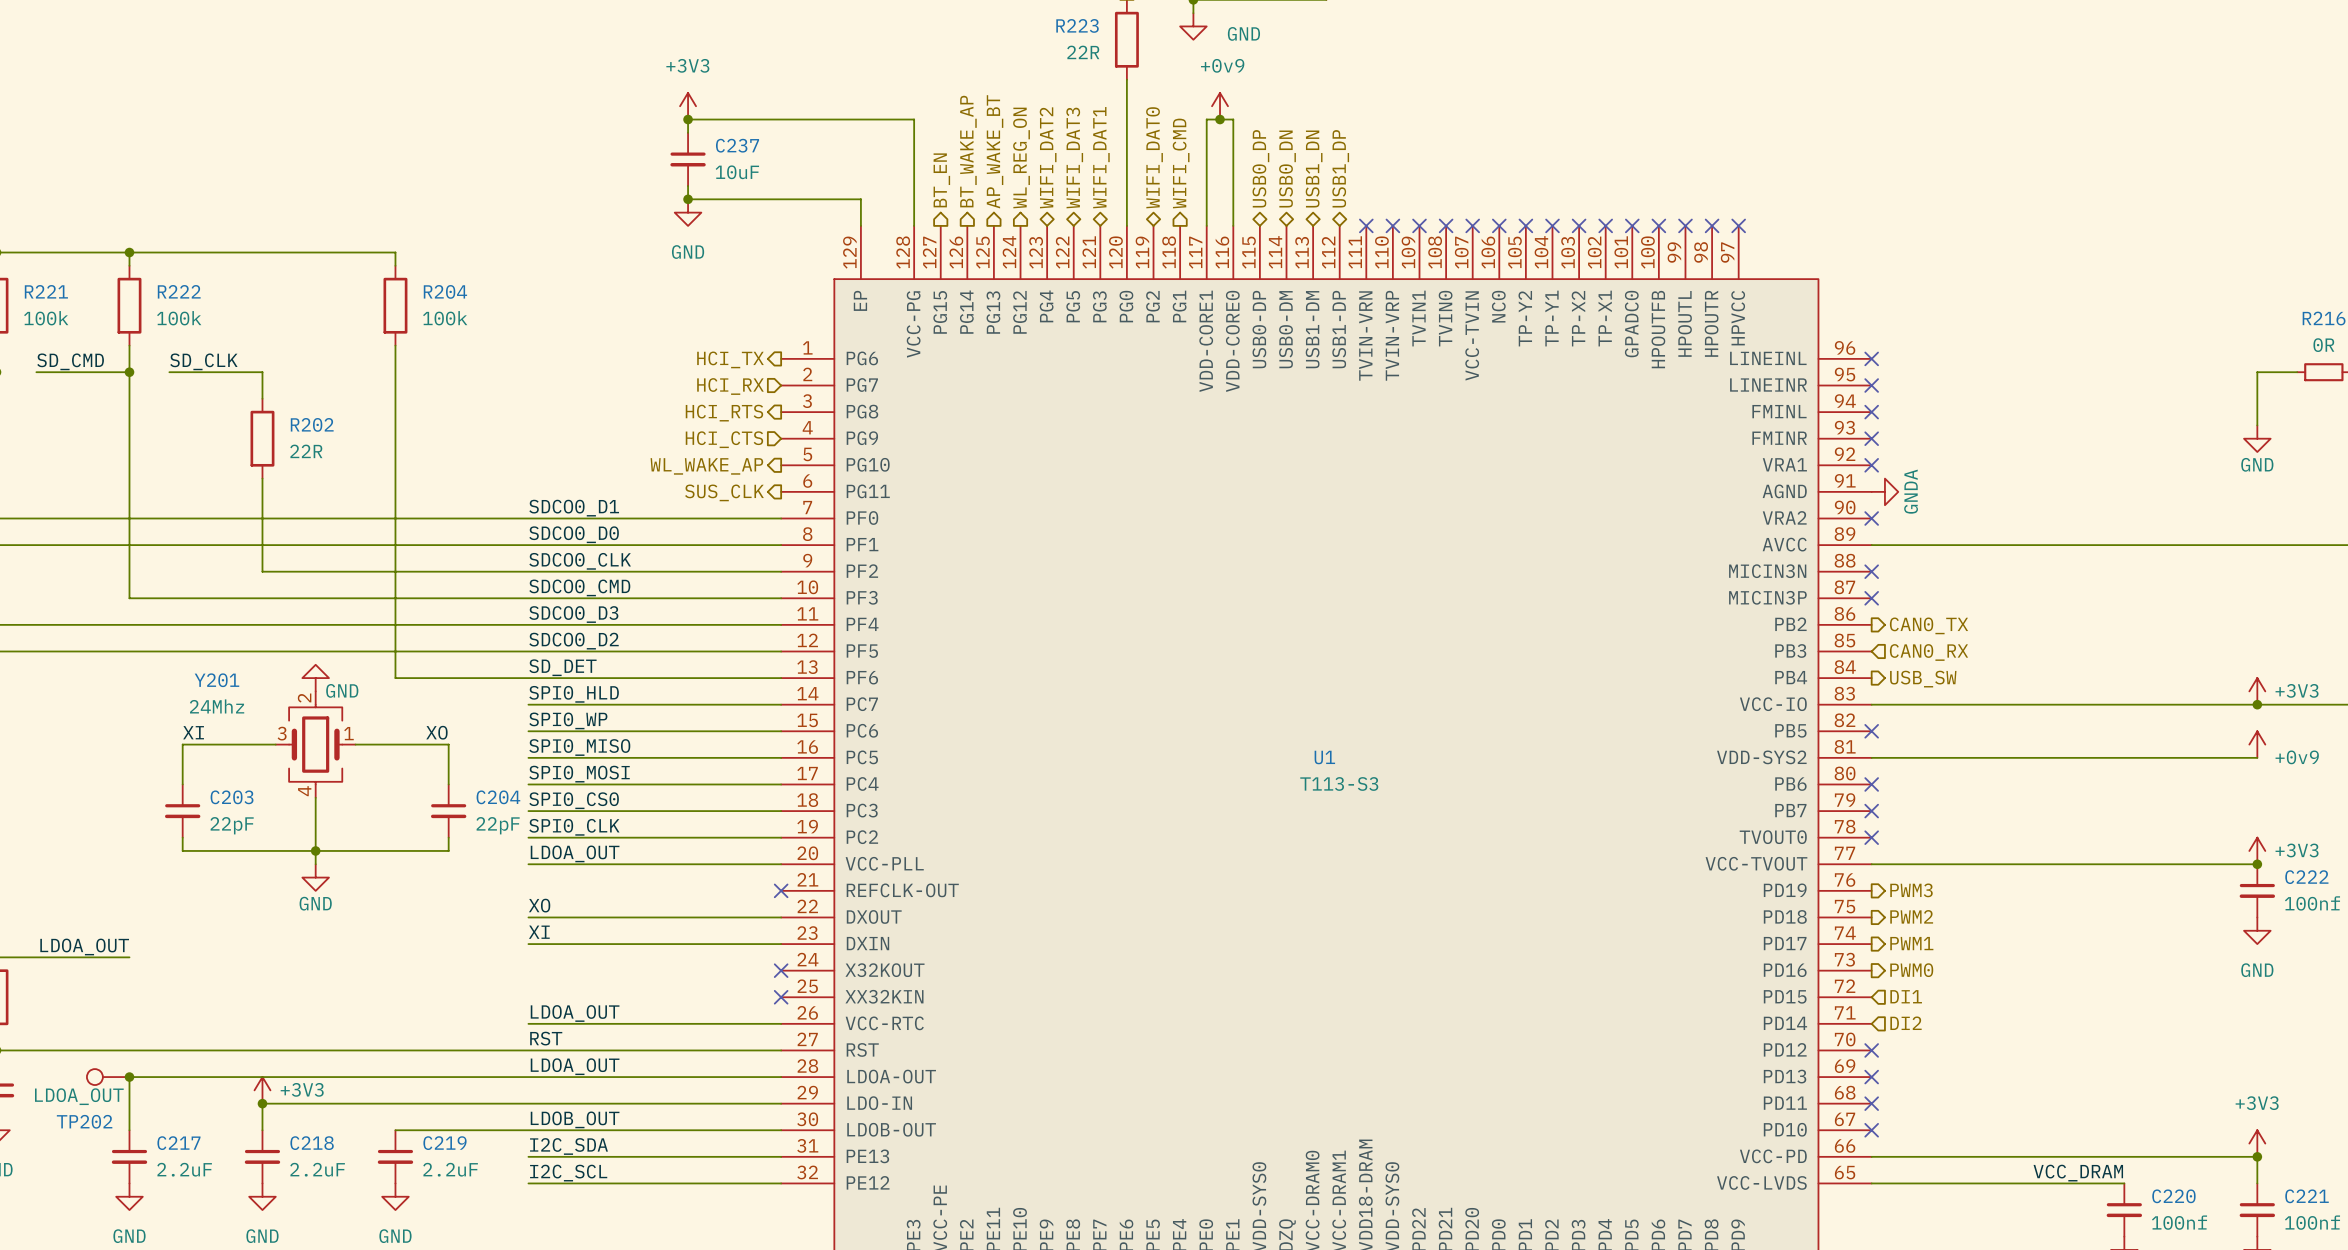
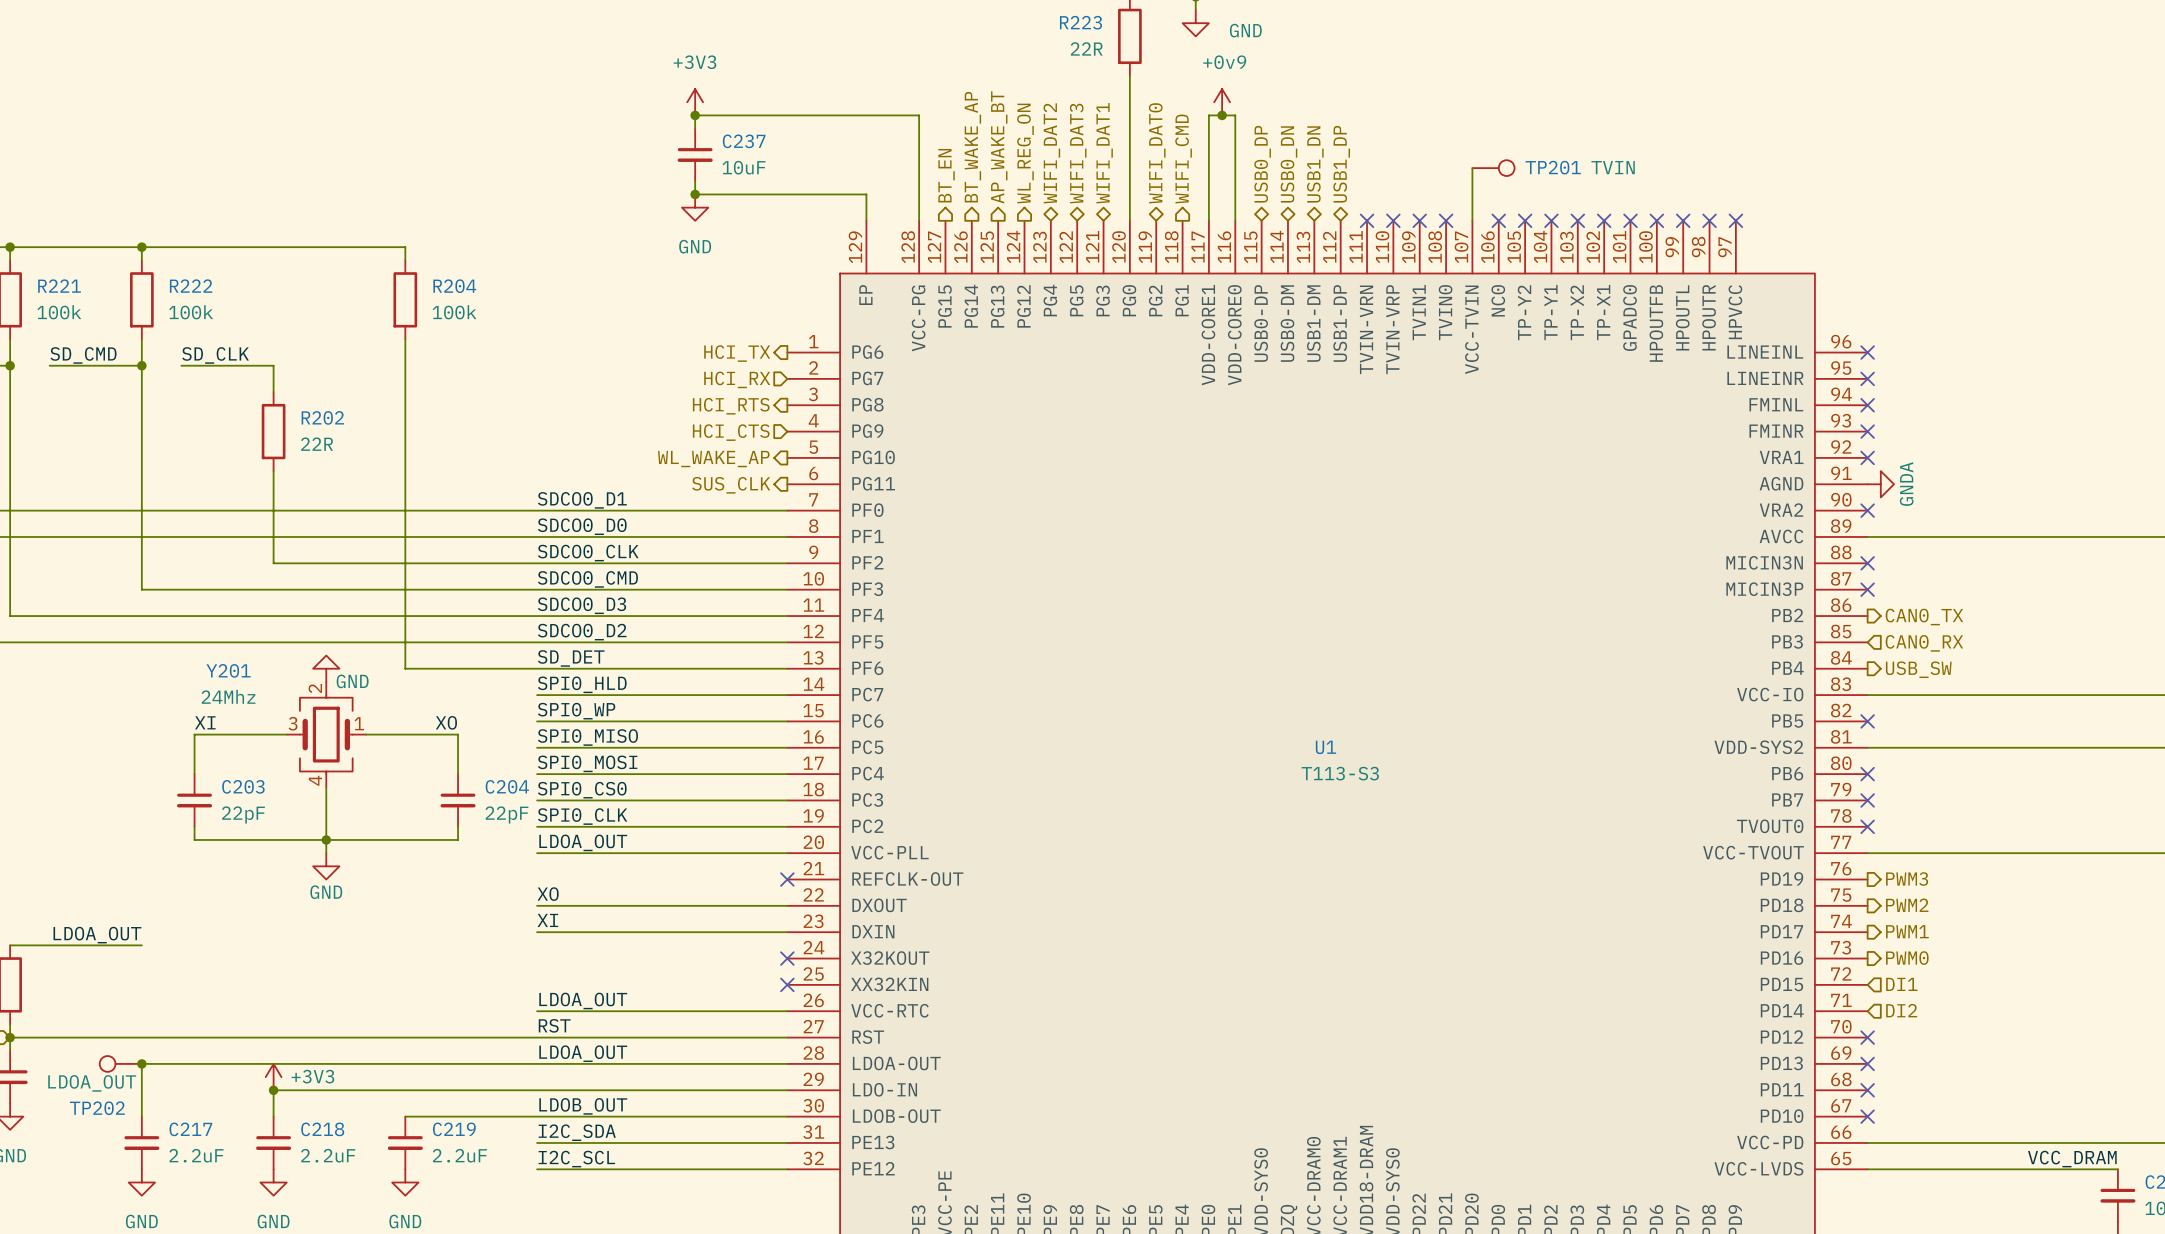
wire: none -> (1472, 168) (1472, 220)
TP201: none -> TVIN (1493, 168)
no-connect mark: (1472, 225) -> none

